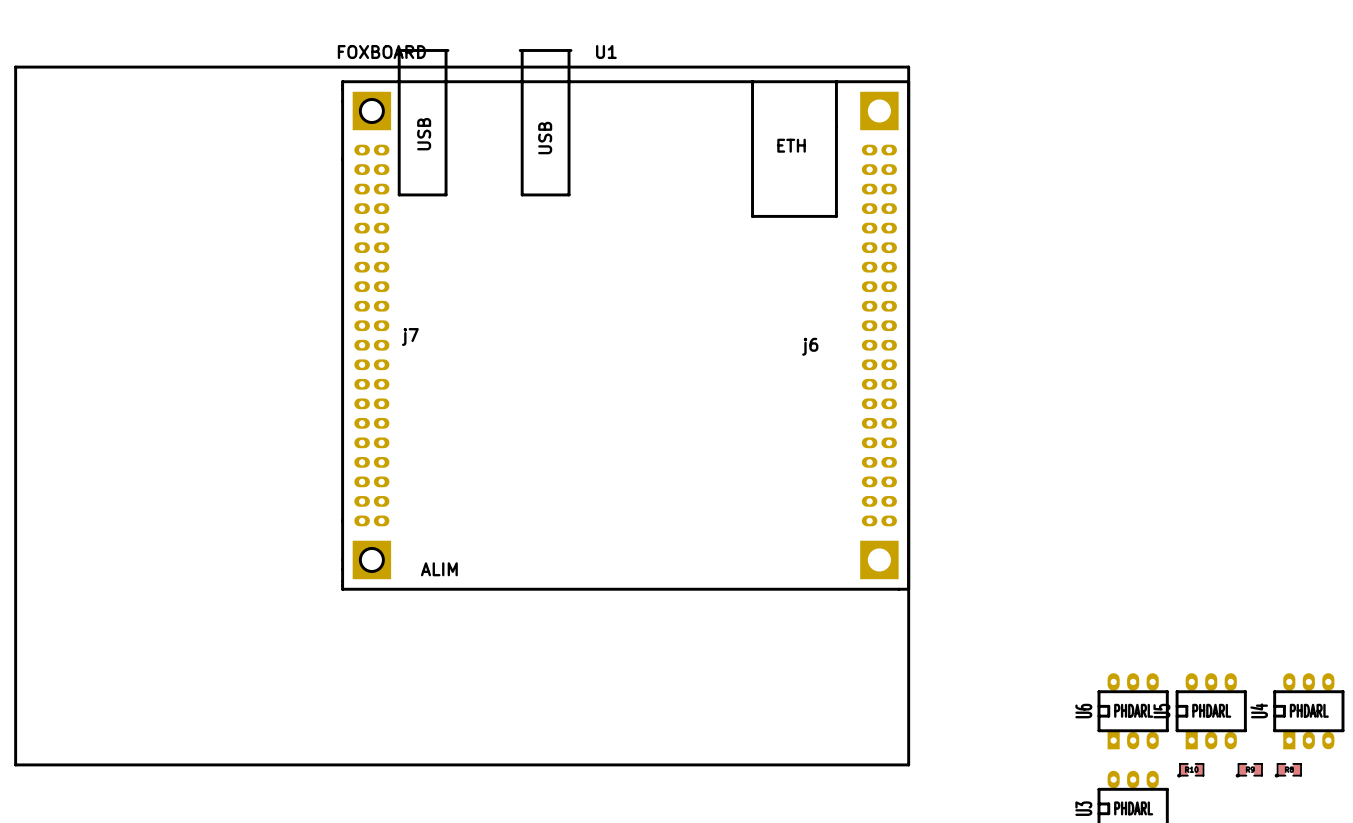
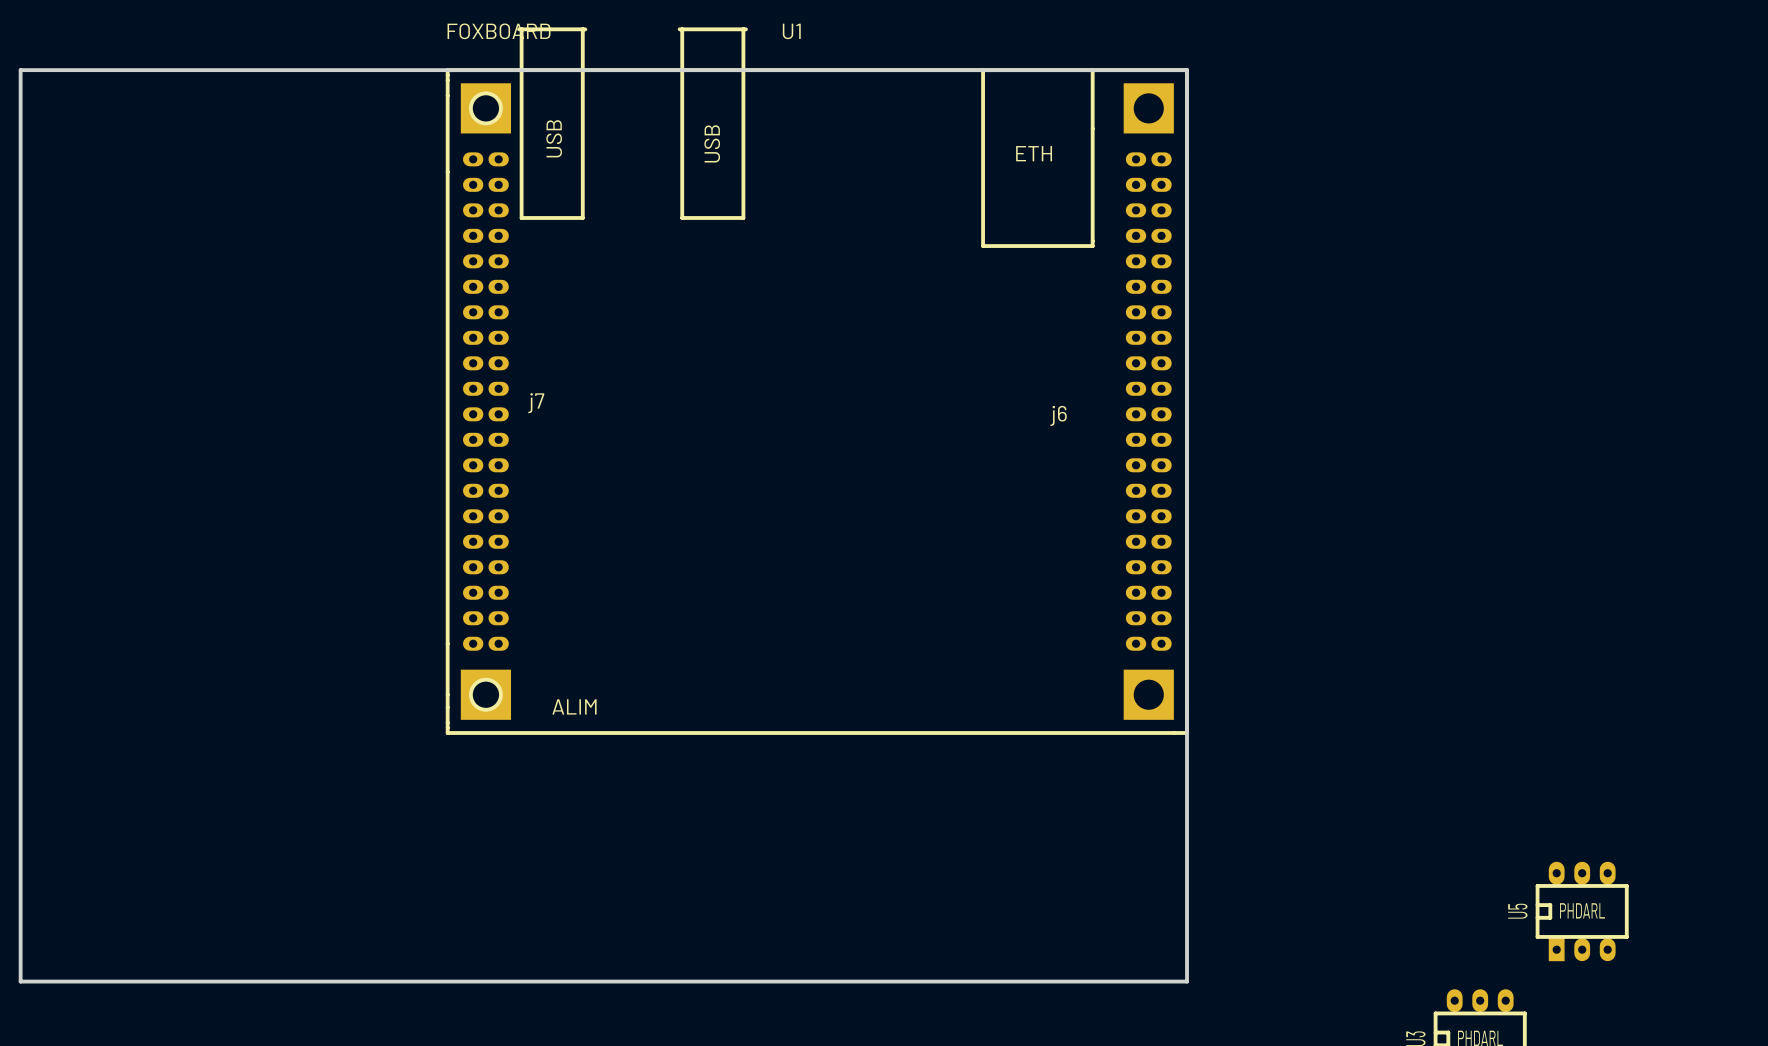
U1 position: (625, 319) -> (817, 381)
U6: PHDARL (1133, 711) -> none
U4: PHDARL (1308, 711) -> none
part: (1190, 770) -> none
part: (1249, 770) -> none
part: (1288, 770) -> none

